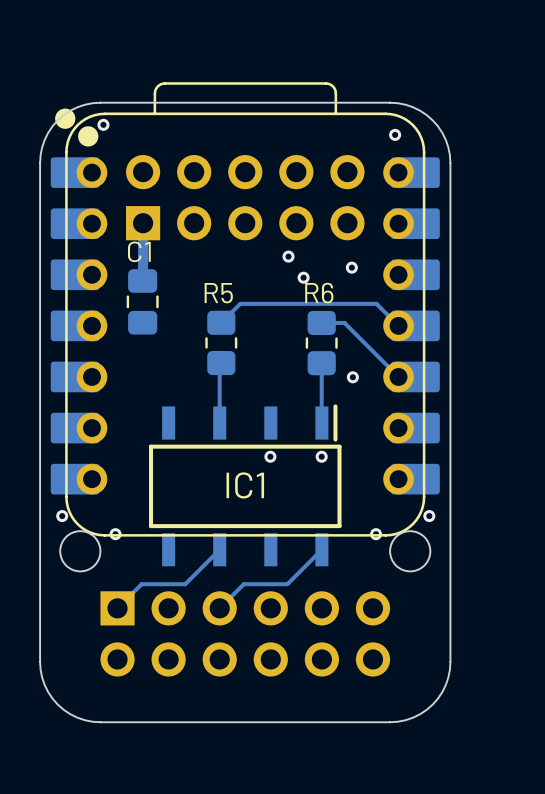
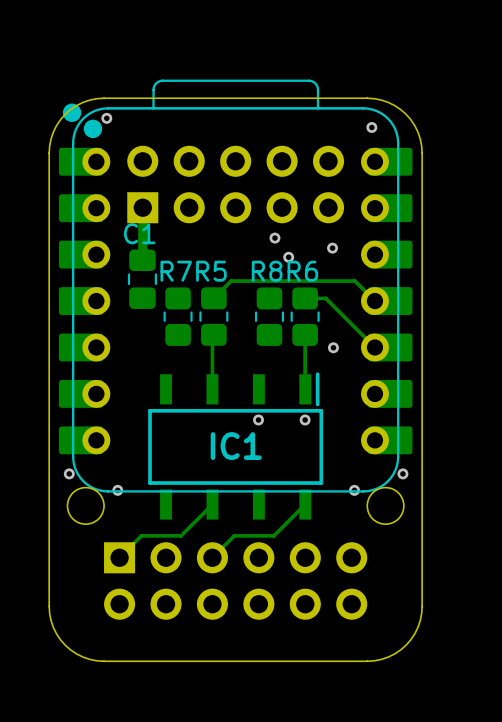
R7: none -> (178, 316)
R8: none -> (269, 316)

